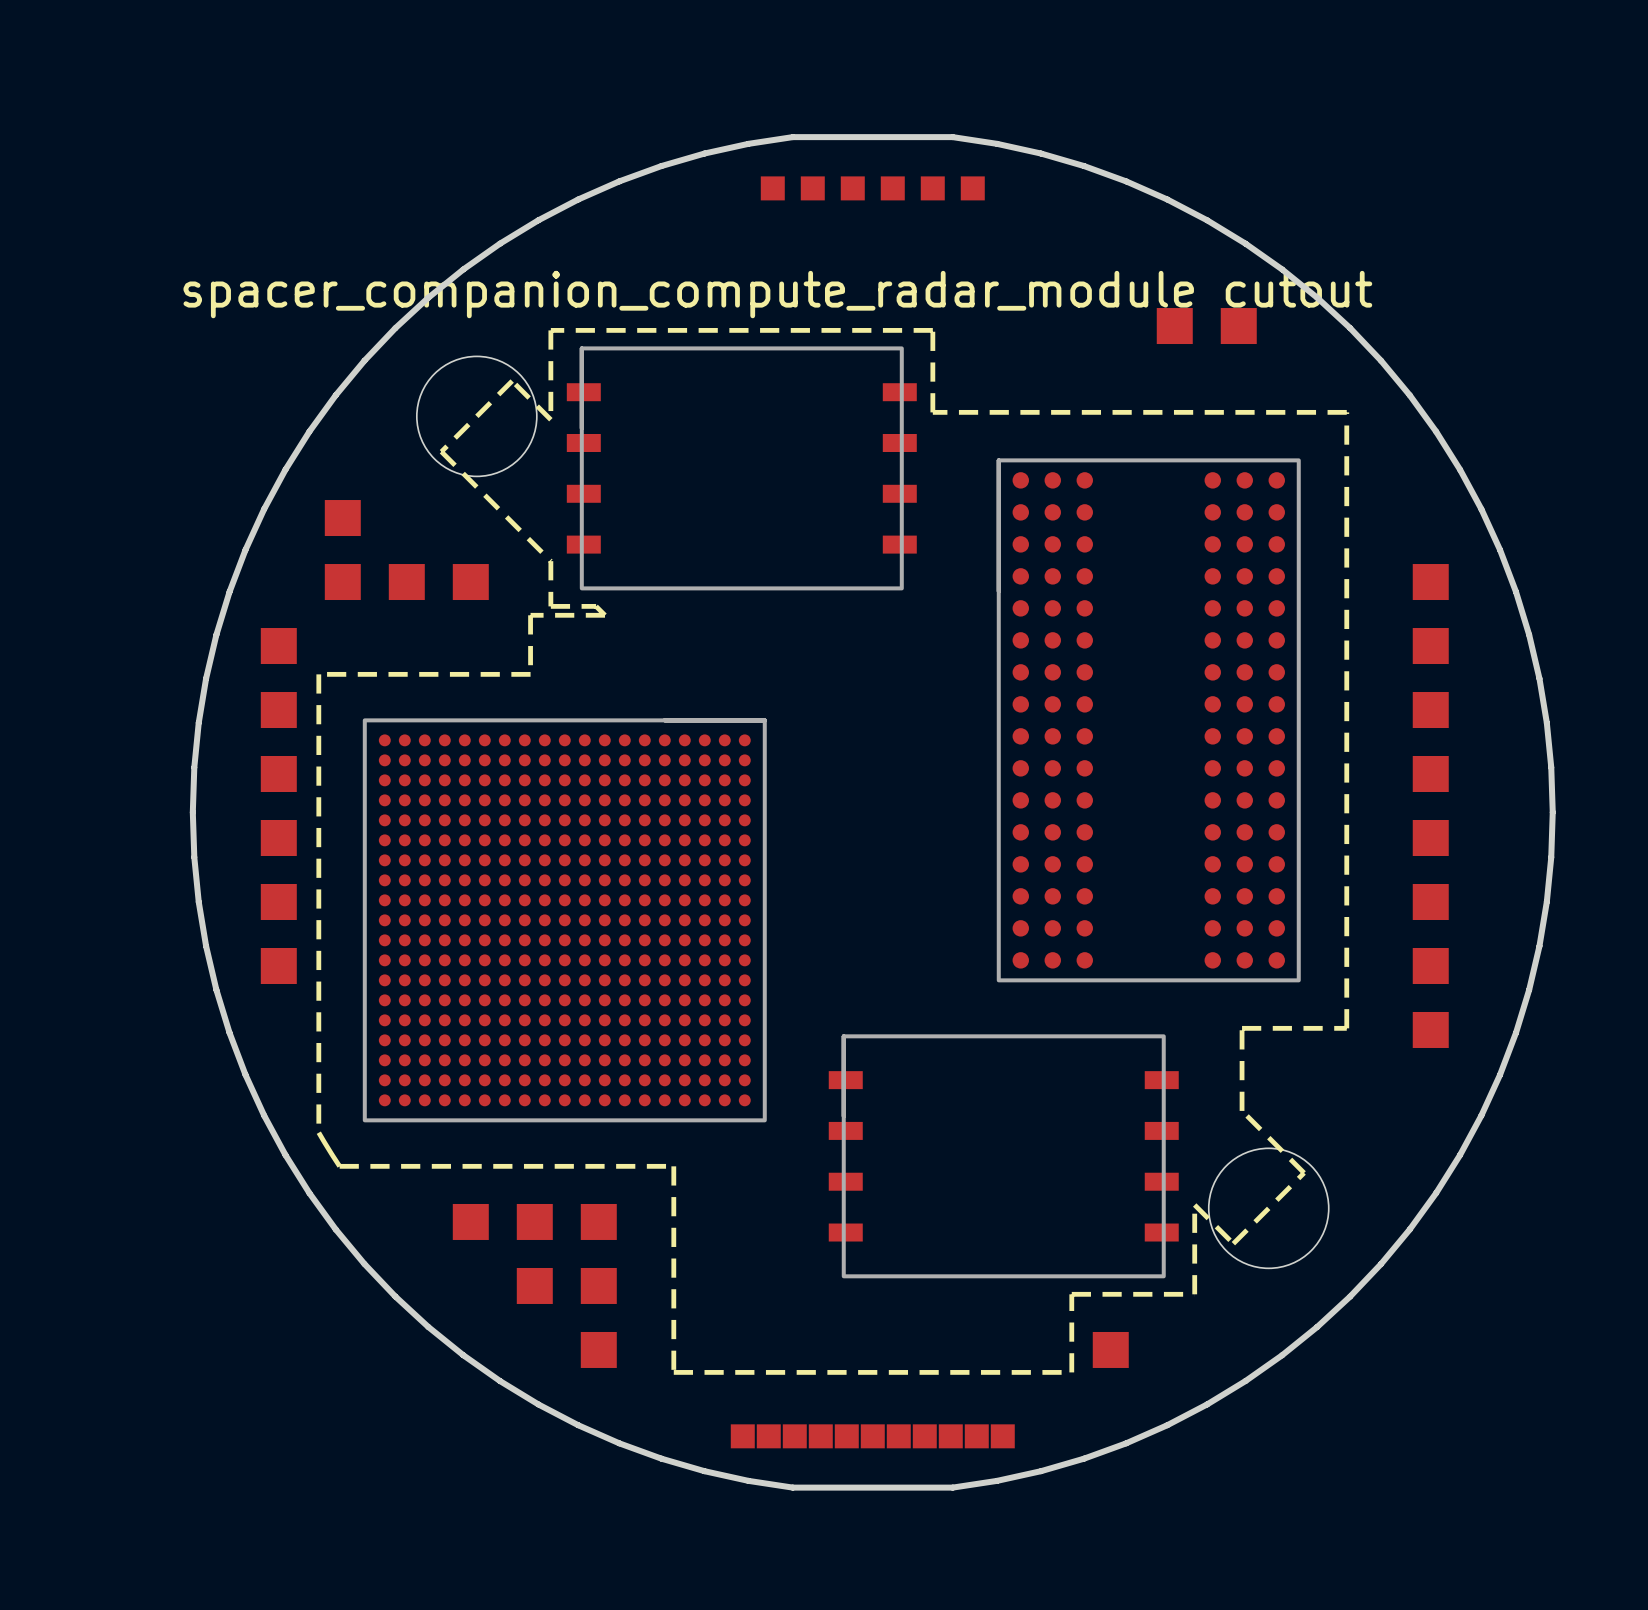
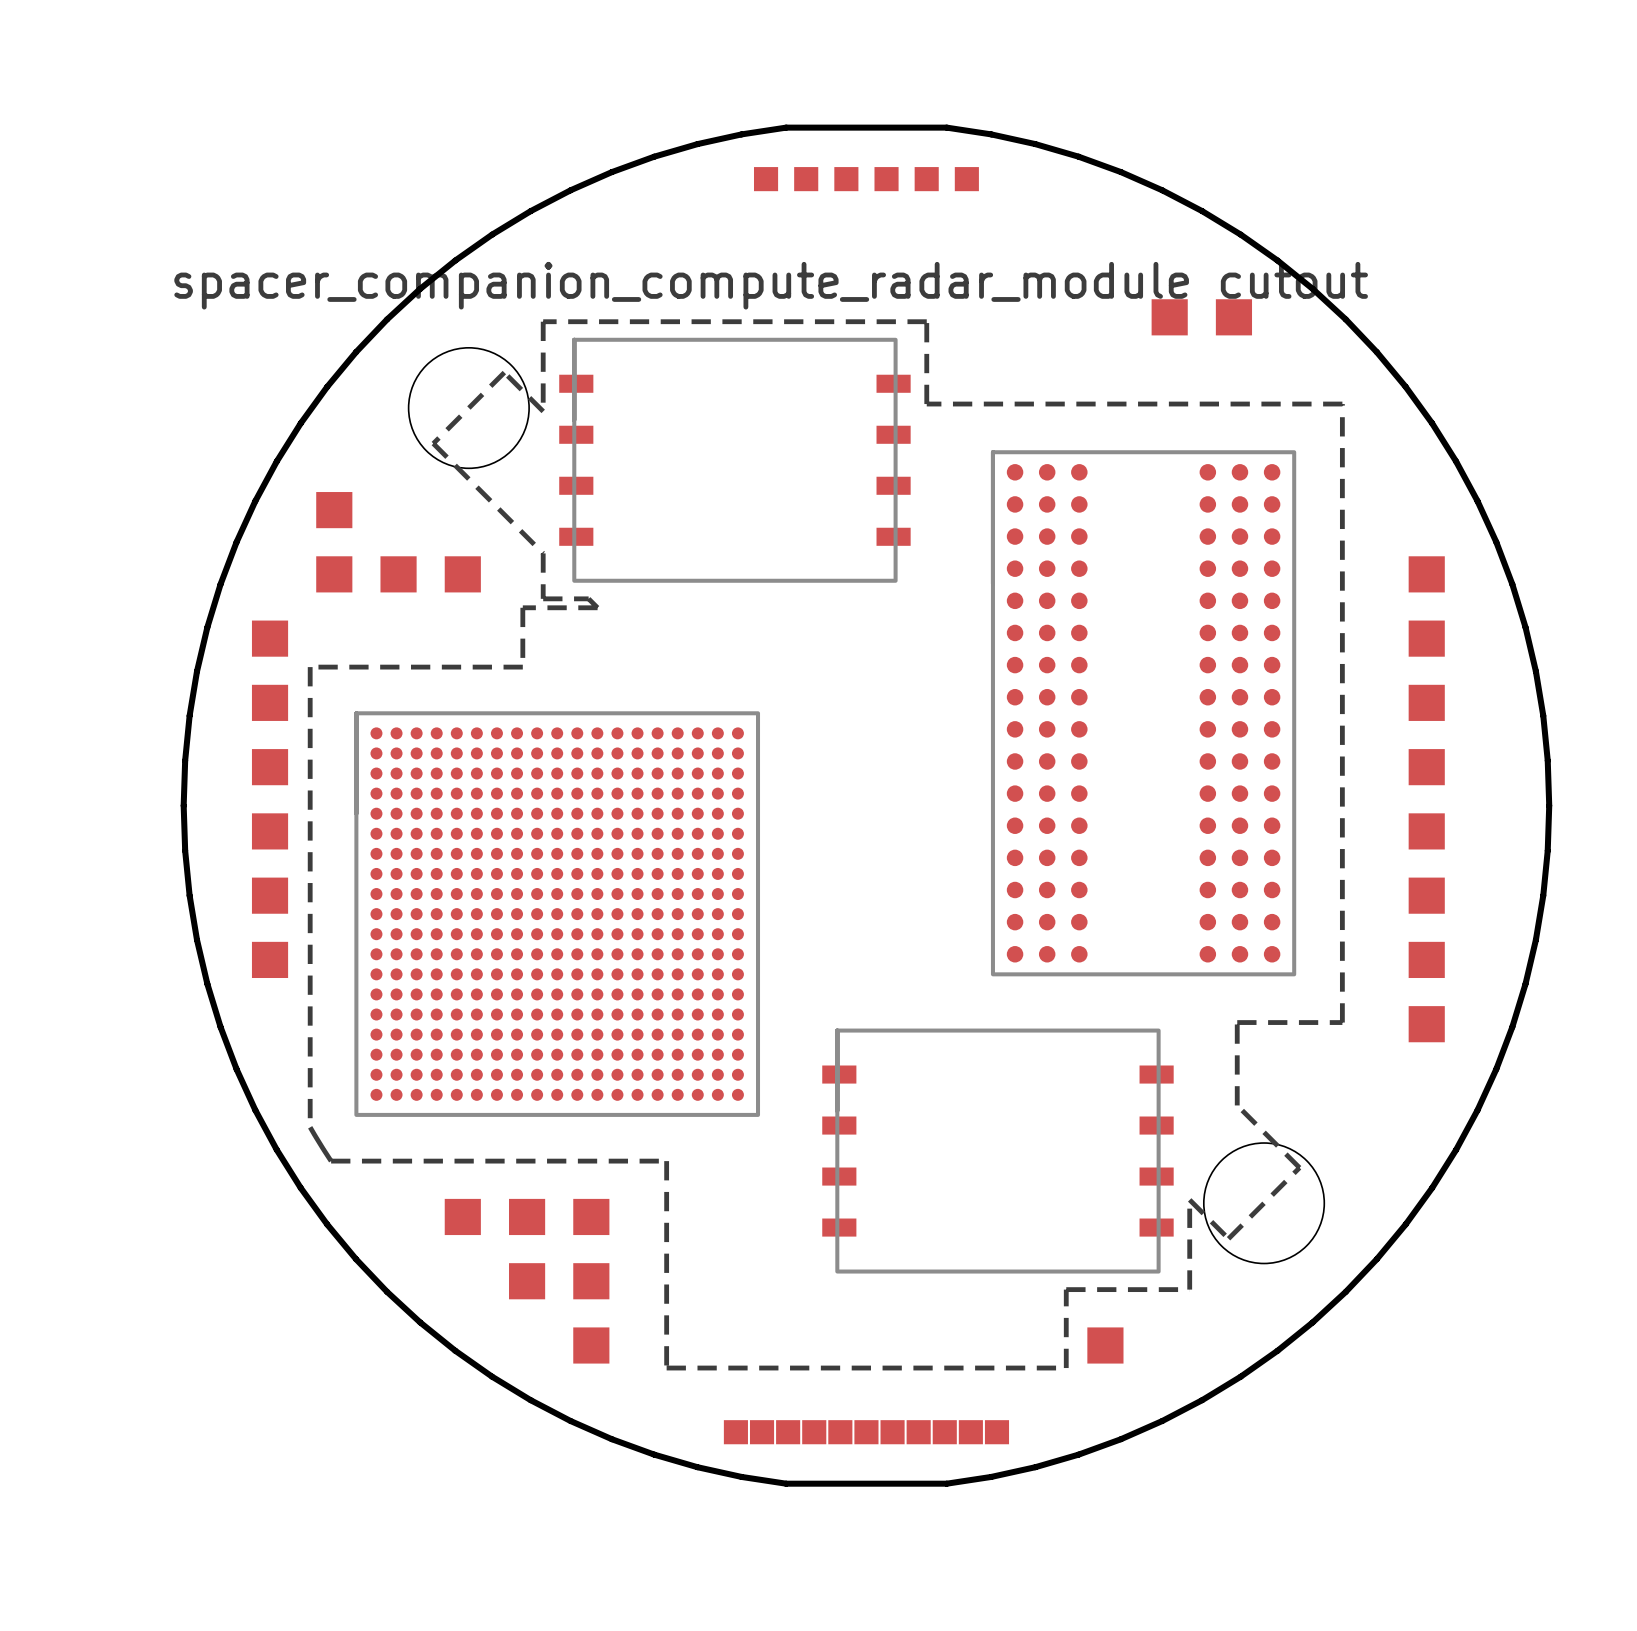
part rotation: 0° (564, 920) -> 90° counterclockwise (557, 914)

